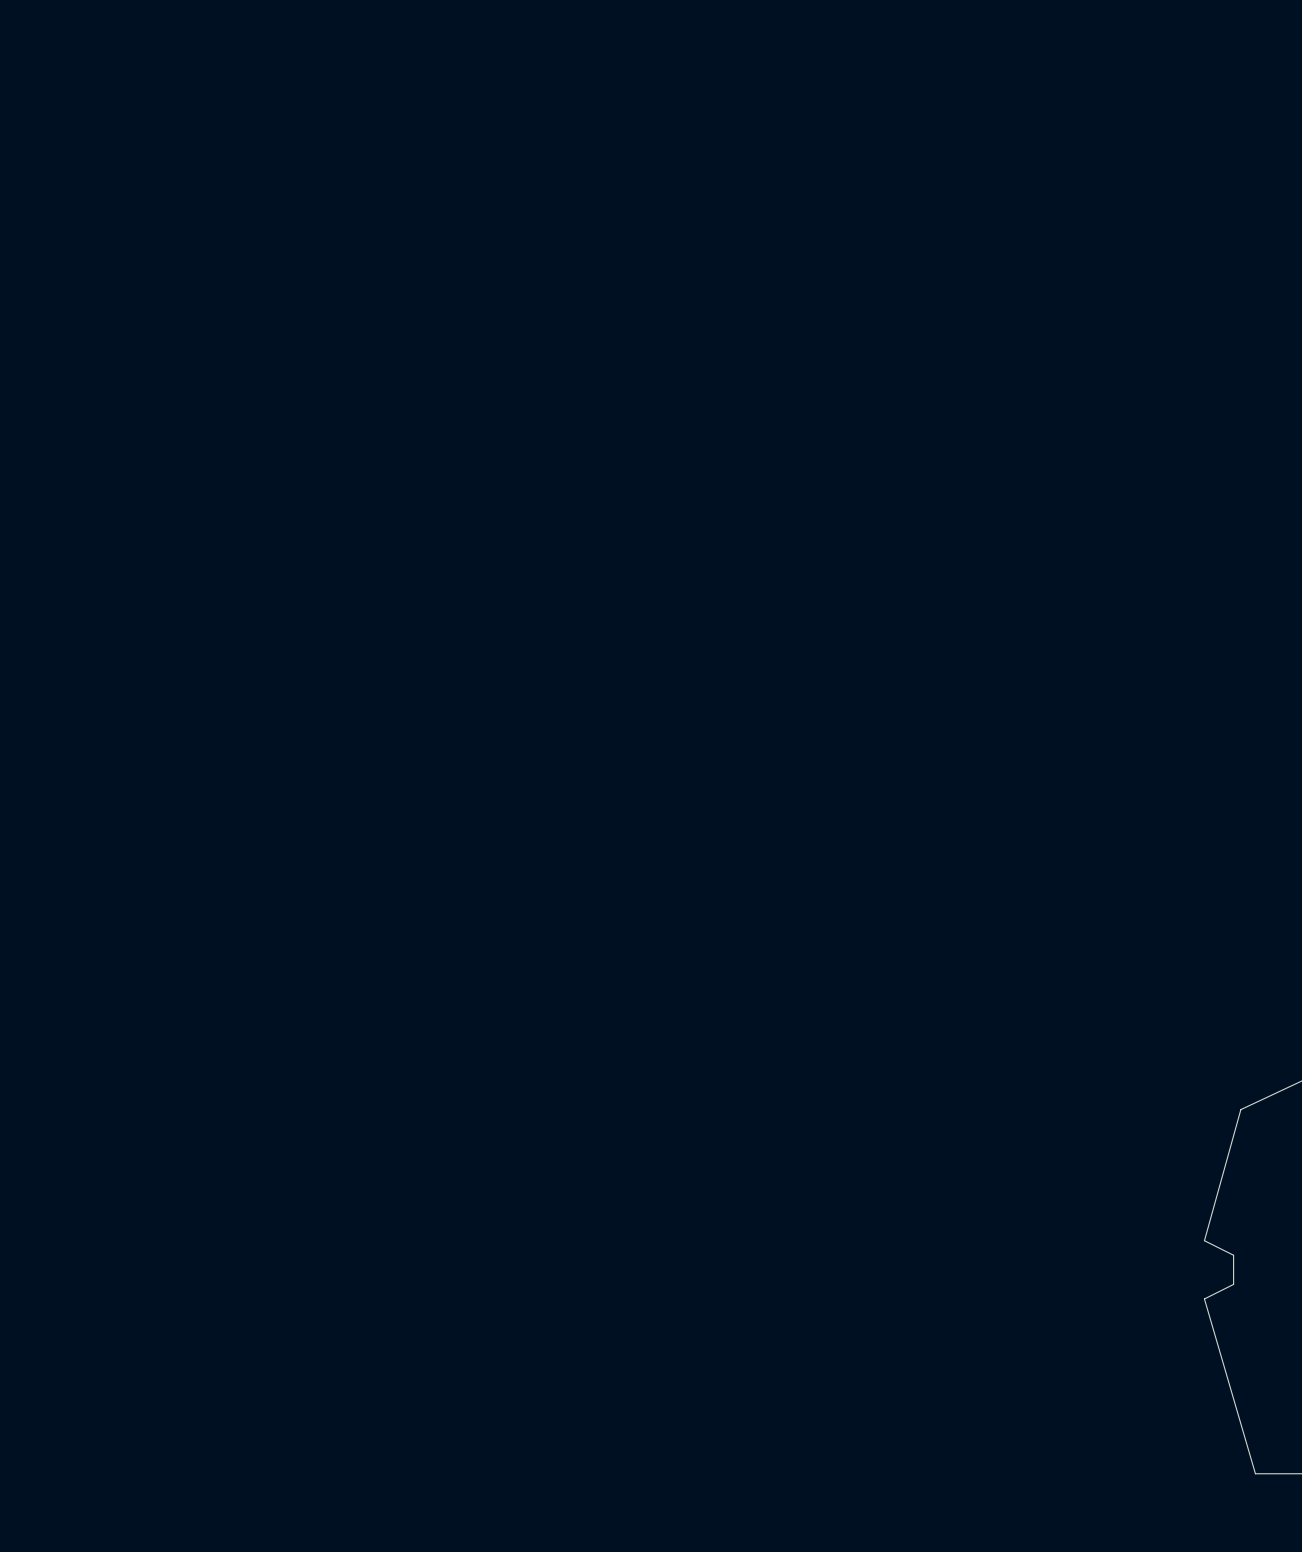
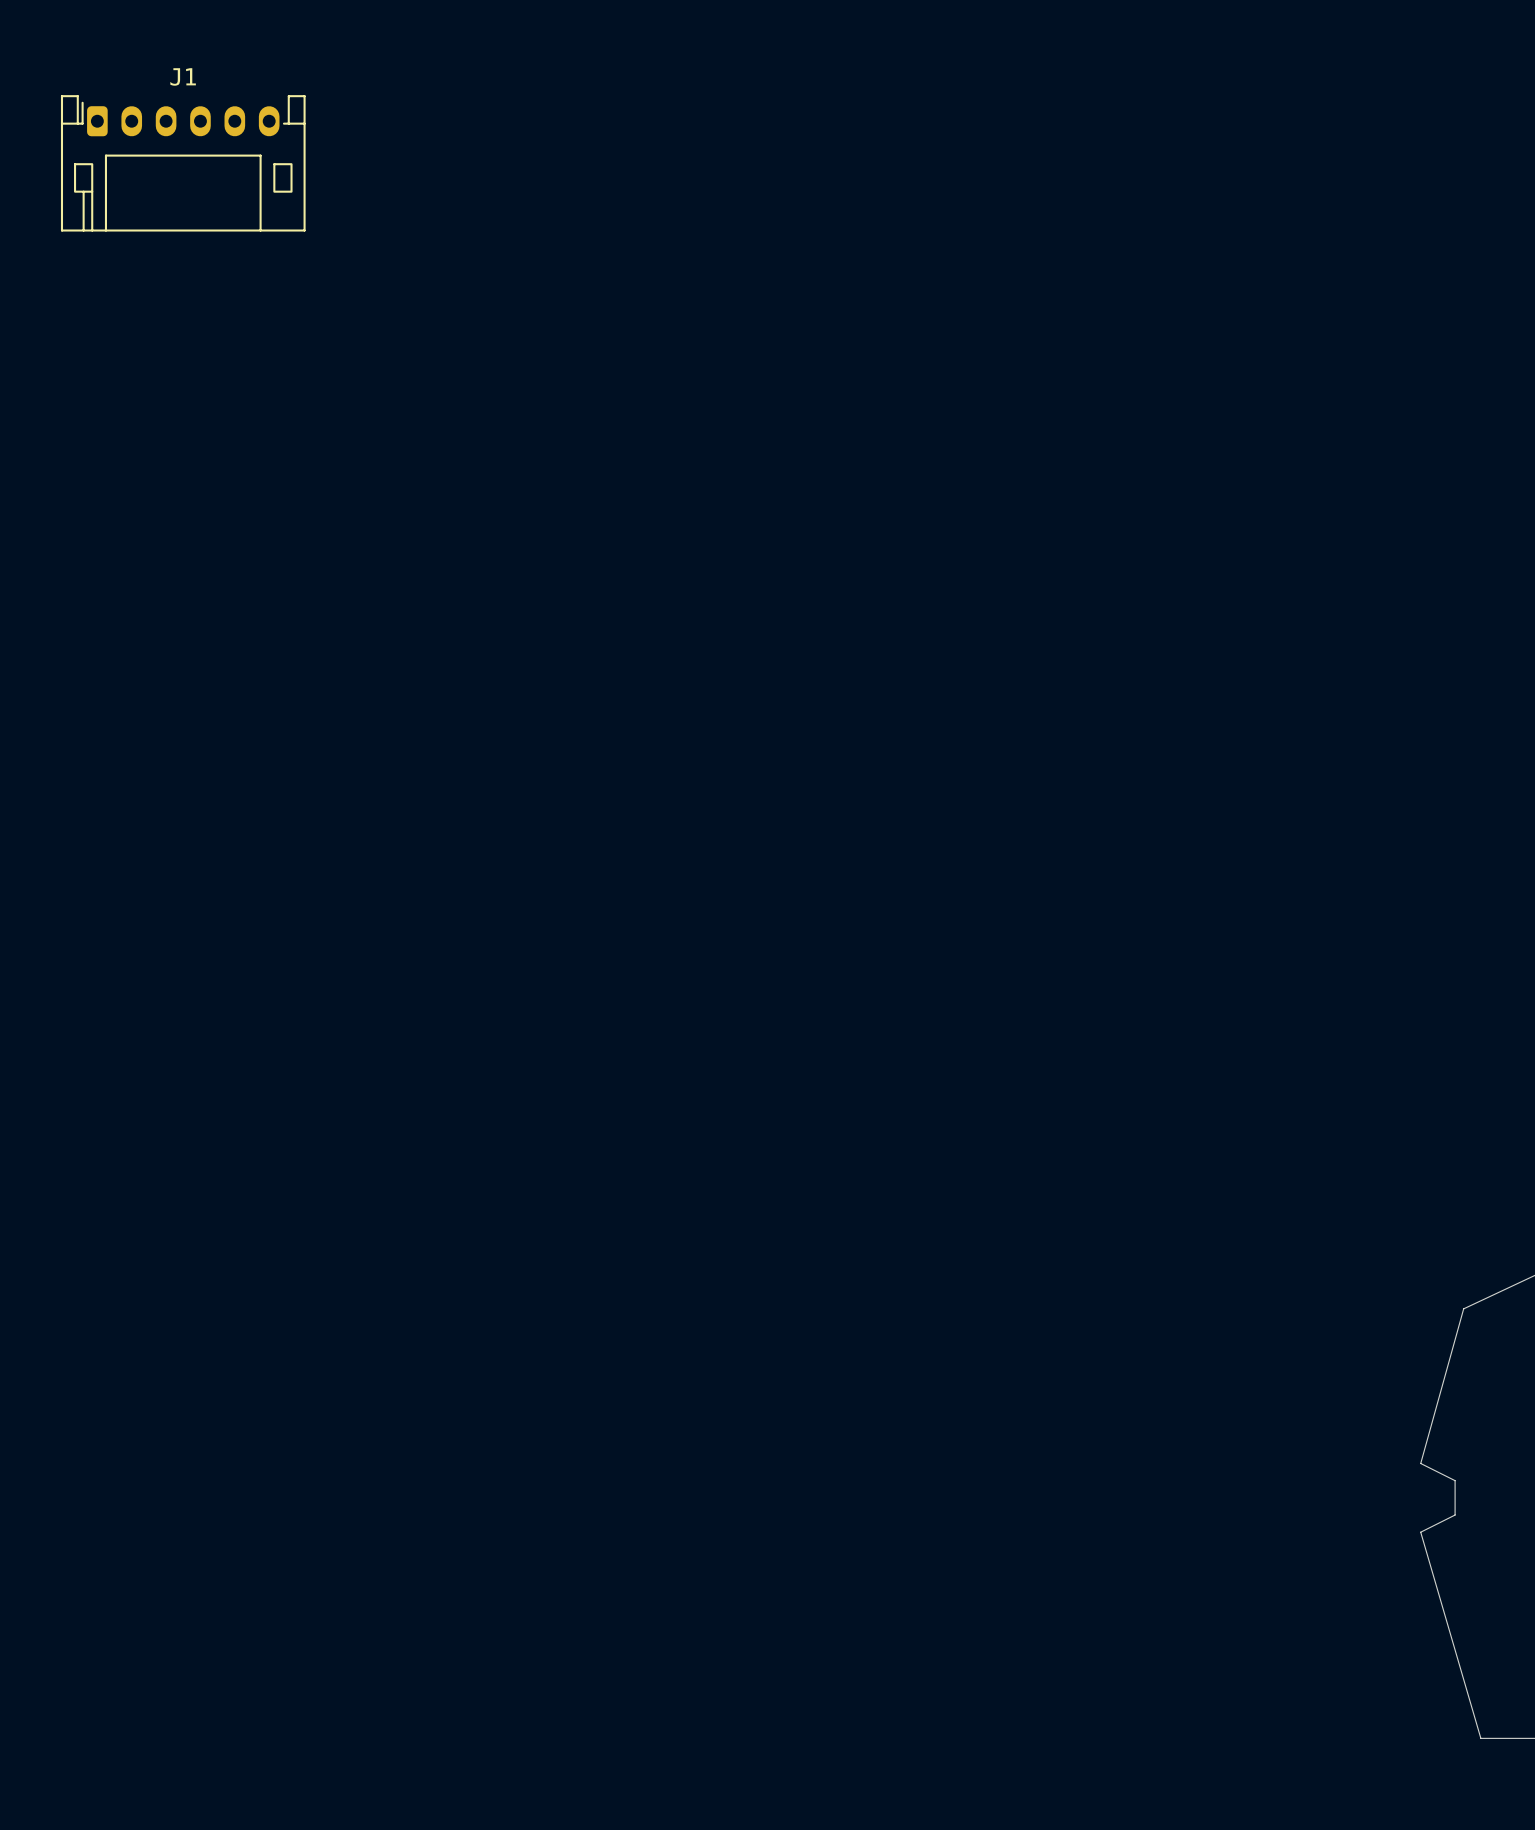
J1: none -> (183, 163)

